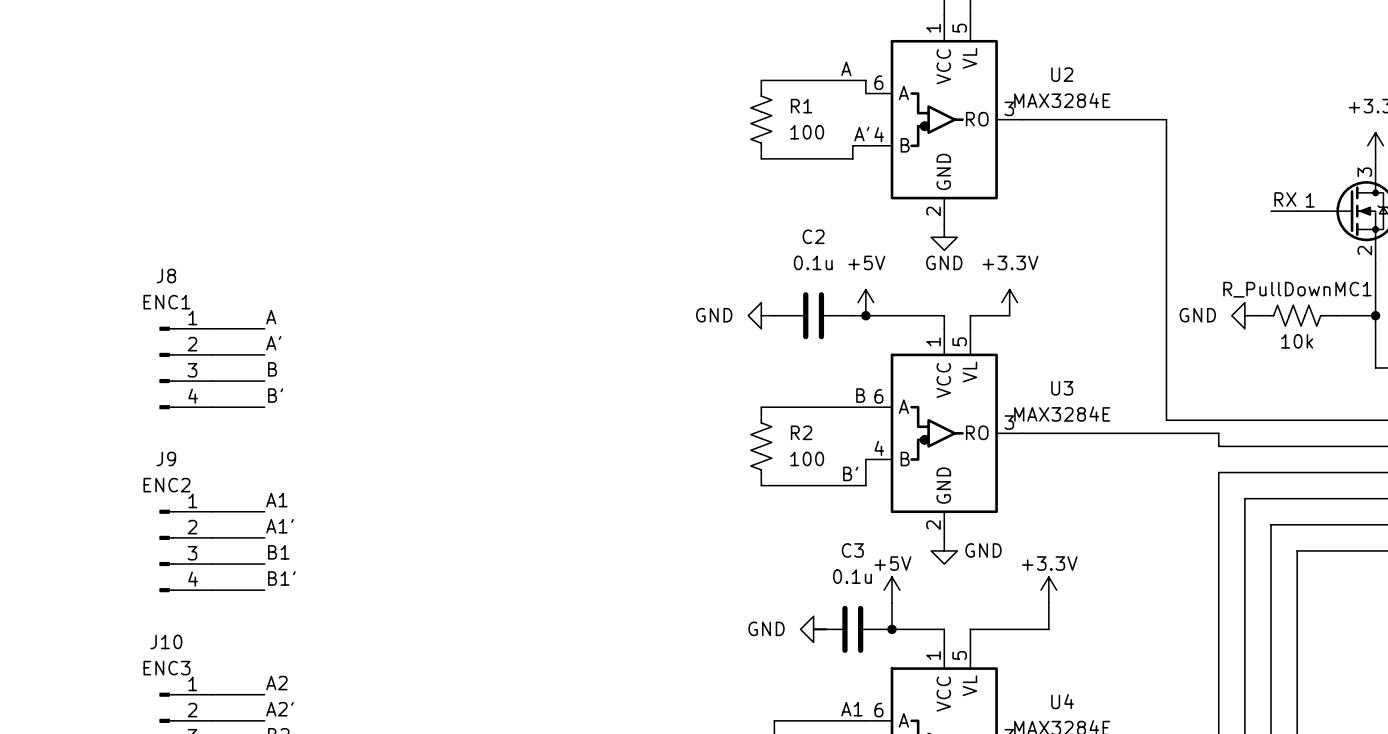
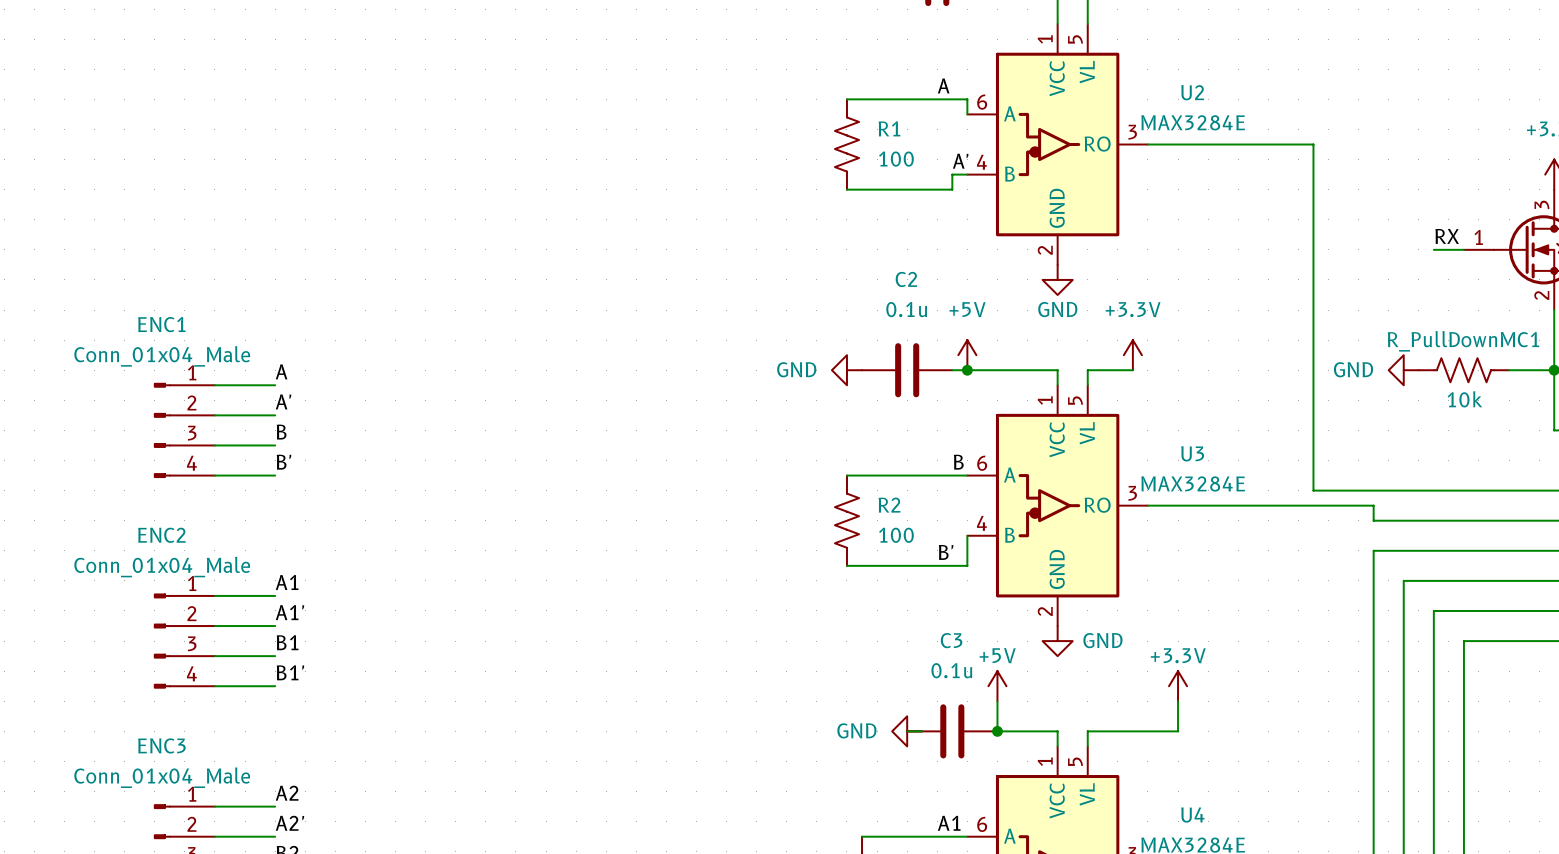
J8 name: J8 (166, 276) -> ENC1 (161, 324)
J8 value: ENC1 (166, 302) -> Conn_01x04_Male (162, 356)
J9 name: J9 (166, 458) -> ENC2 (161, 535)
J9 value: ENC2 (166, 485) -> Conn_01x04_Male (162, 567)
J10 name: J10 (166, 641) -> ENC3 (161, 745)
J10 value: ENC3 (166, 668) -> Conn_01x04_Male (162, 777)

